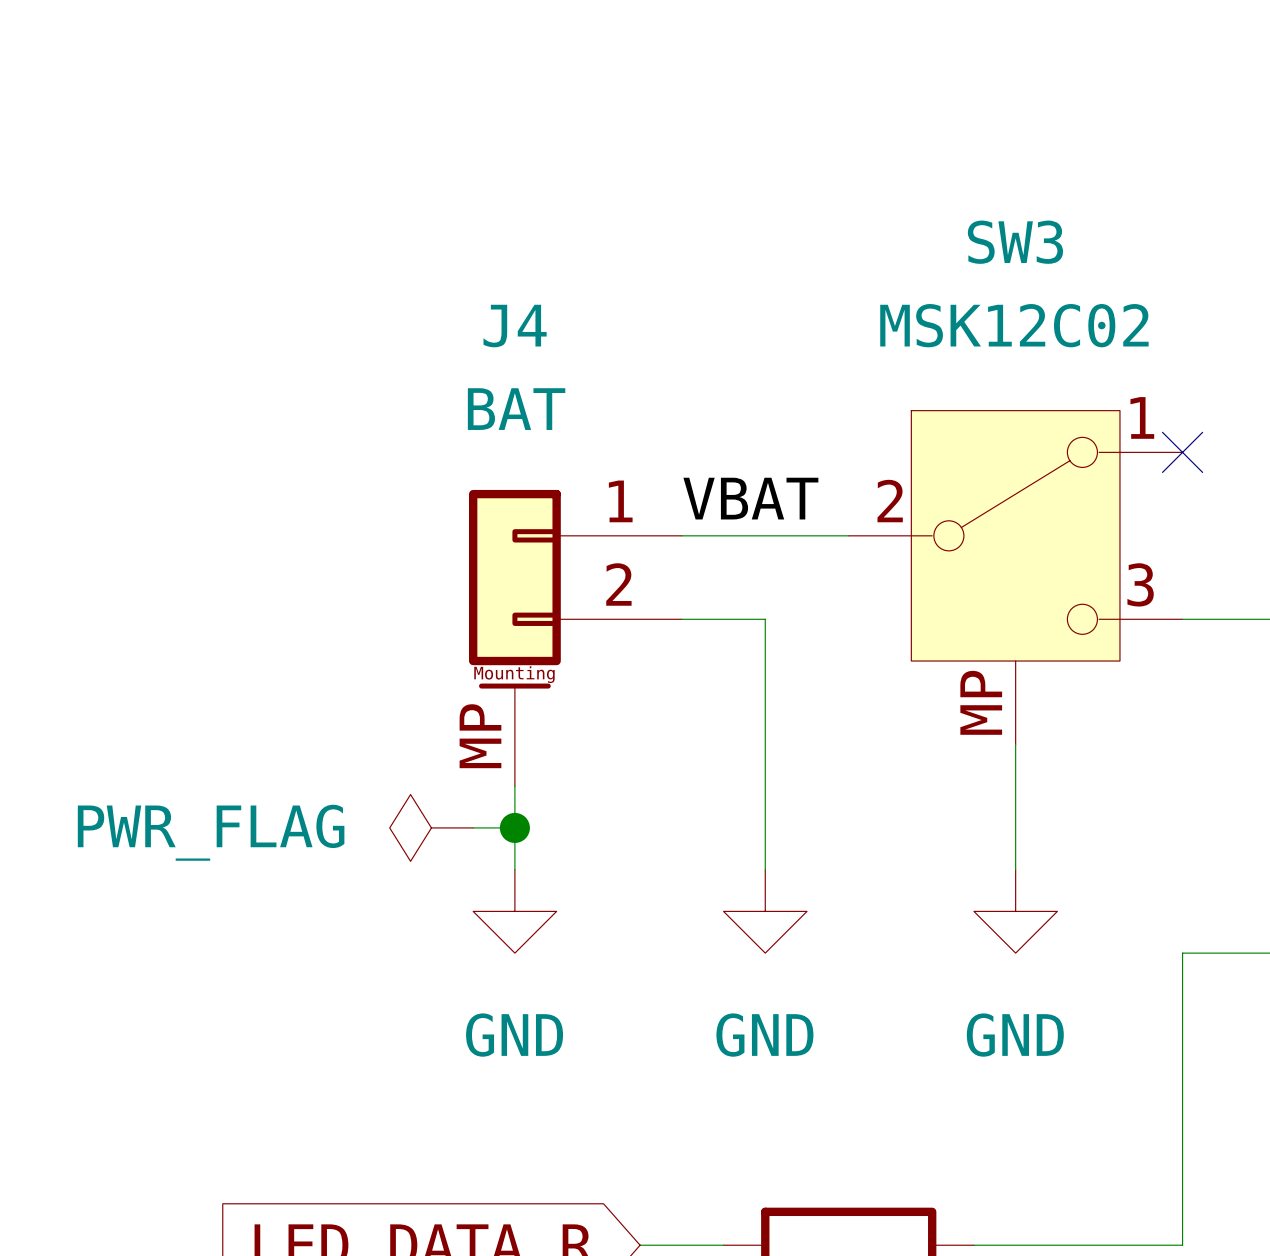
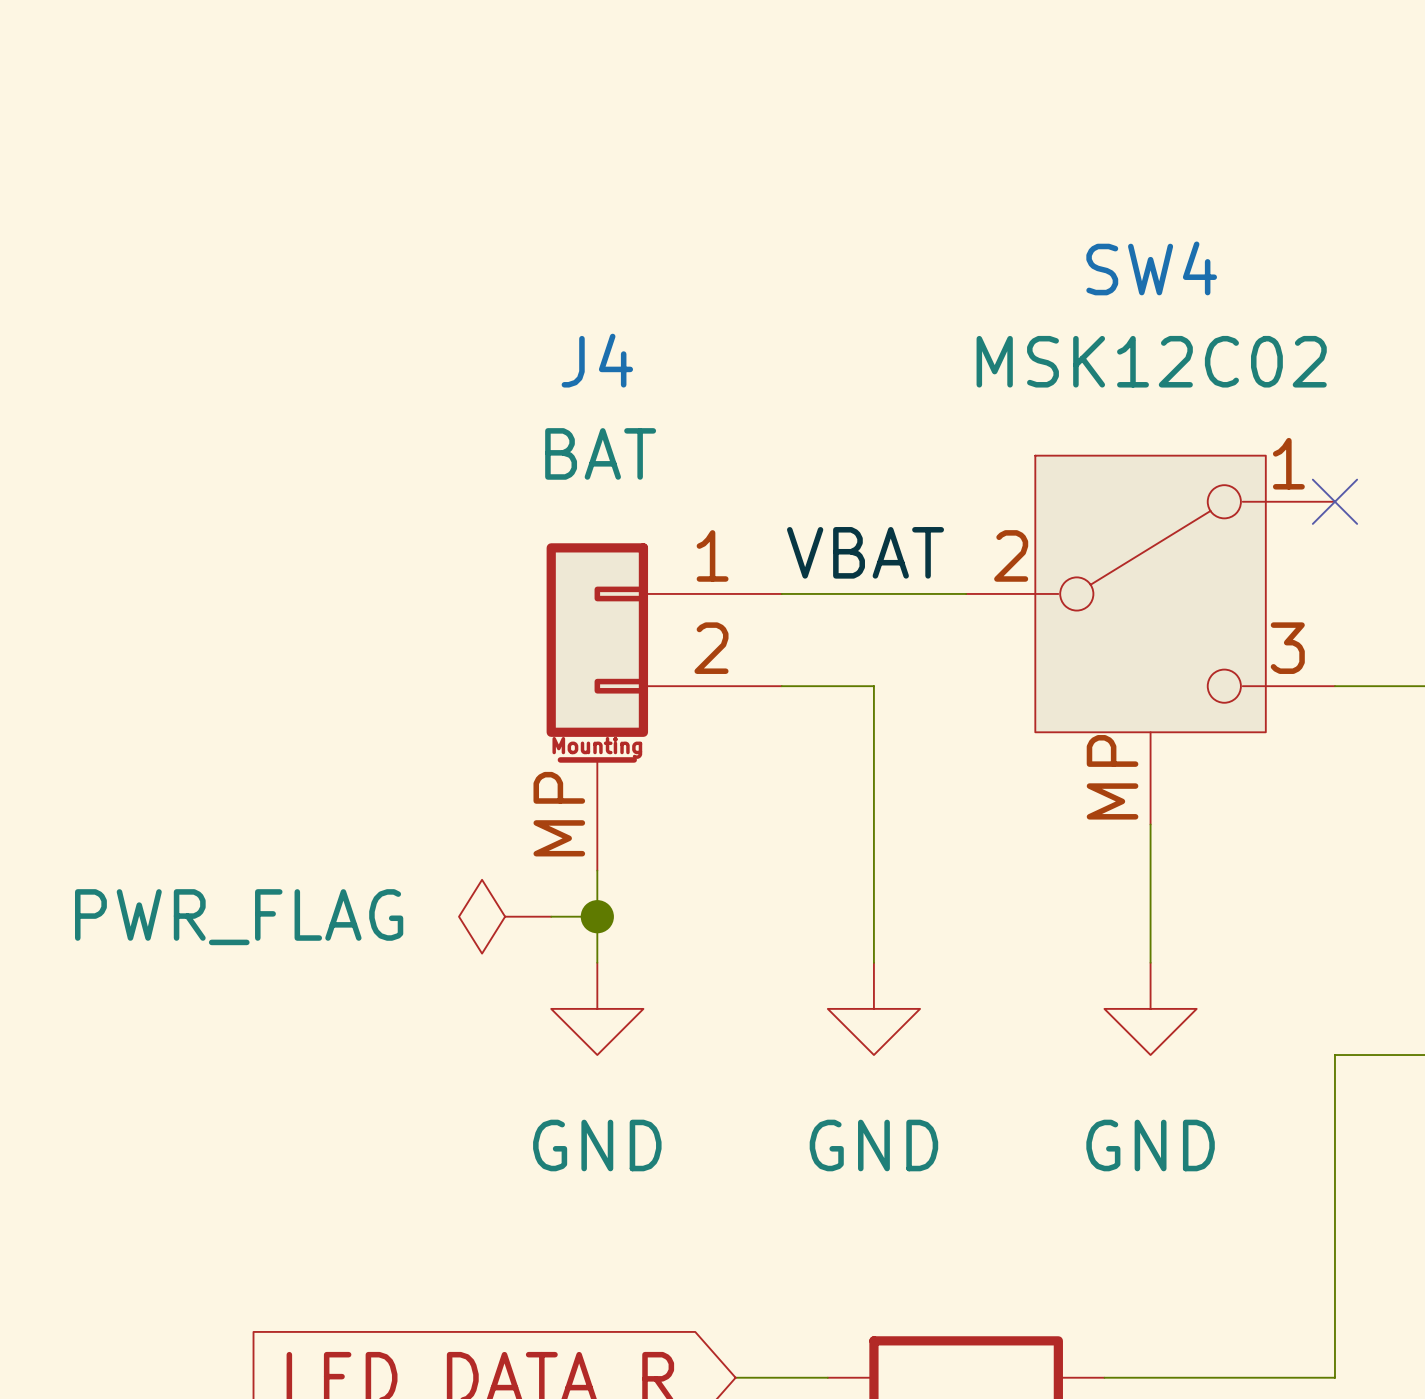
SW3 name: SW3 (1015, 242) -> SW4 (1151, 268)

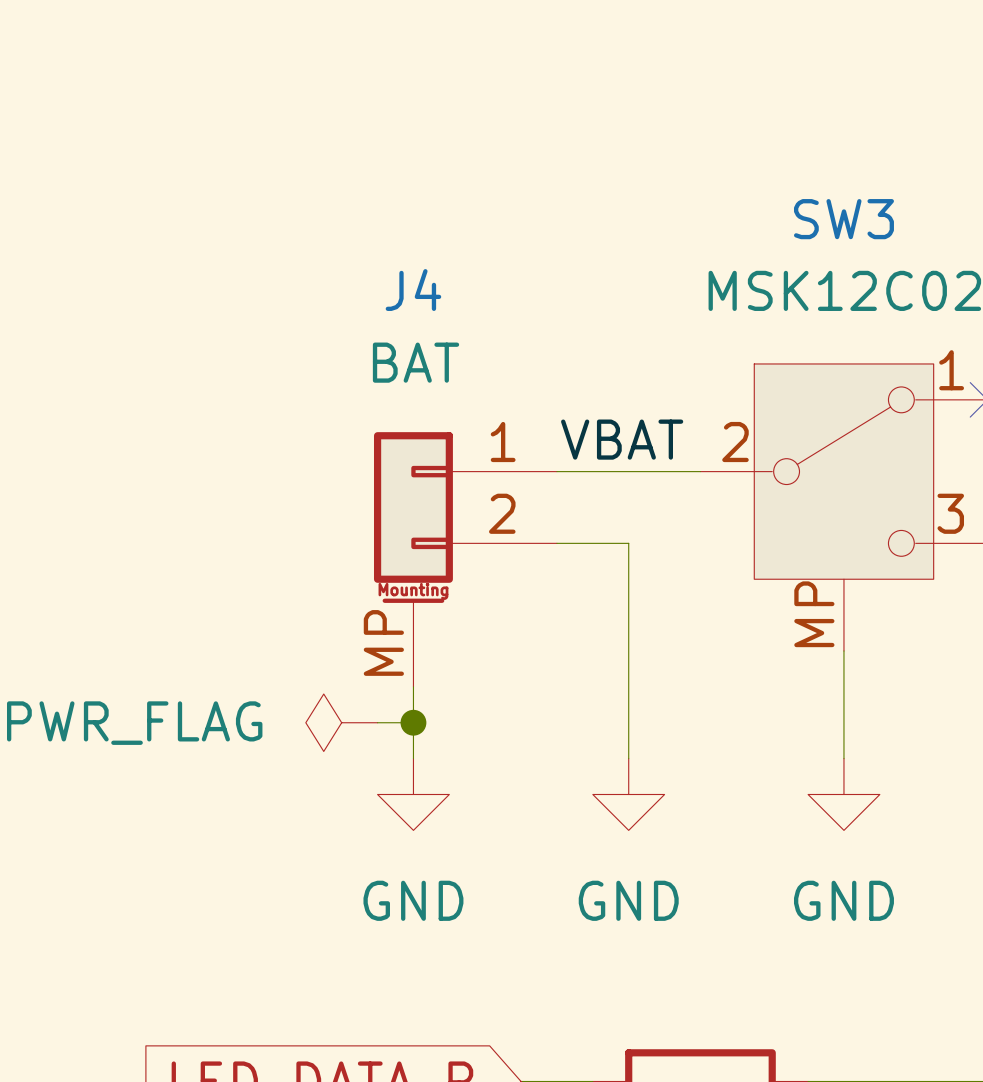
SW4 name: SW4 (1151, 268) -> SW3 (843, 219)

